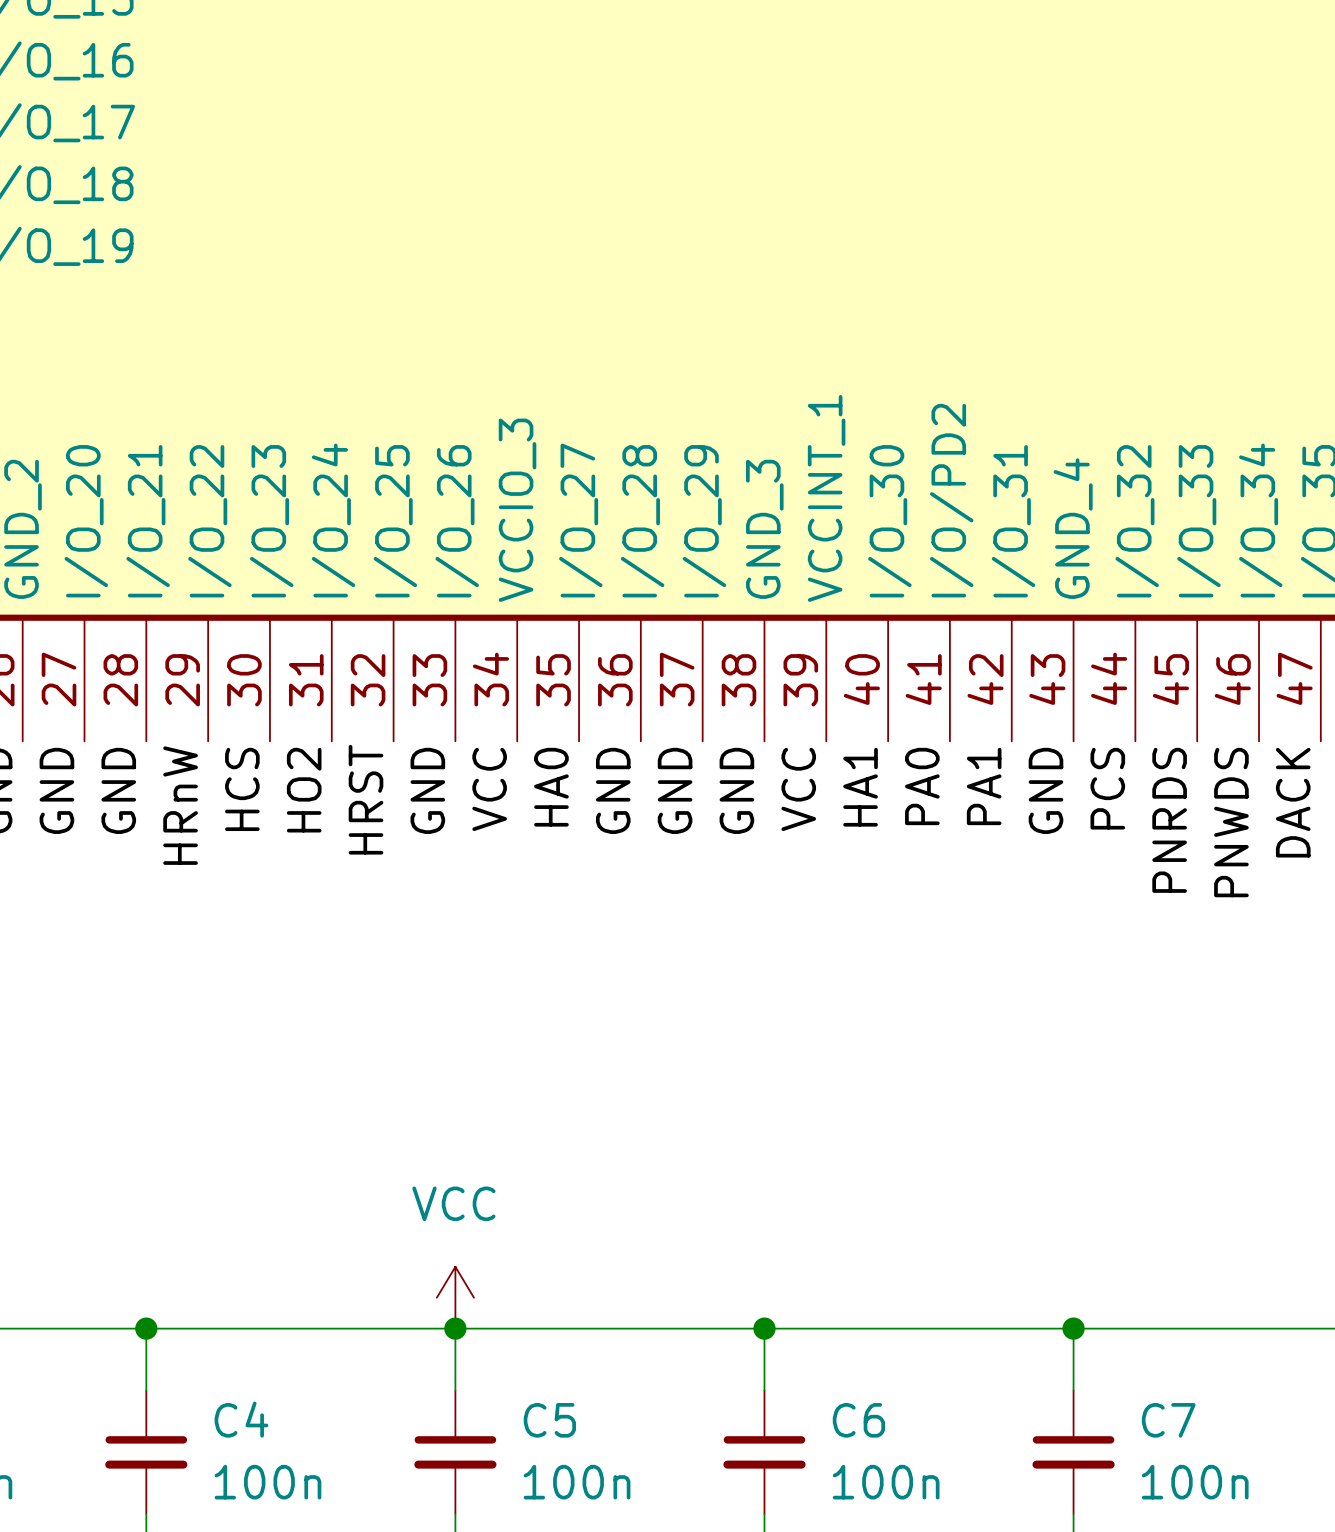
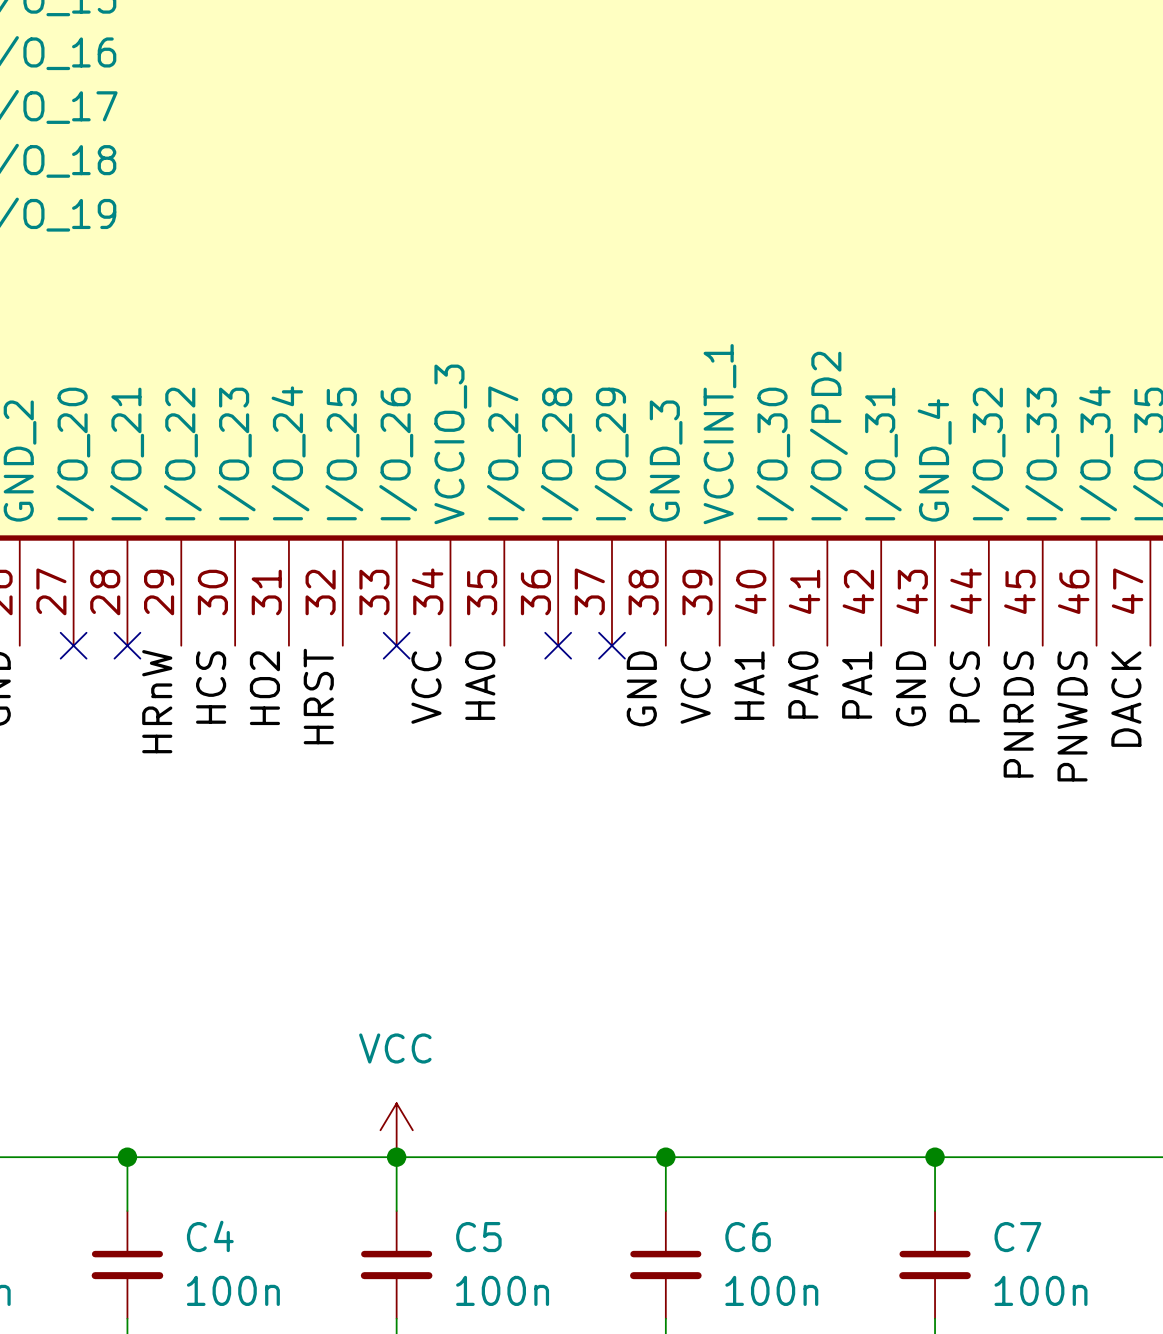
no-connect mark: none -> (73, 645)
no-connect mark: none -> (127, 645)
no-connect mark: none -> (396, 645)
no-connect mark: none -> (558, 645)
no-connect mark: none -> (611, 645)
label: GND (56, 790) -> none
label: GND (118, 790) -> none
label: GND (427, 790) -> none
label: GND (613, 790) -> none
label: GND (675, 790) -> none

